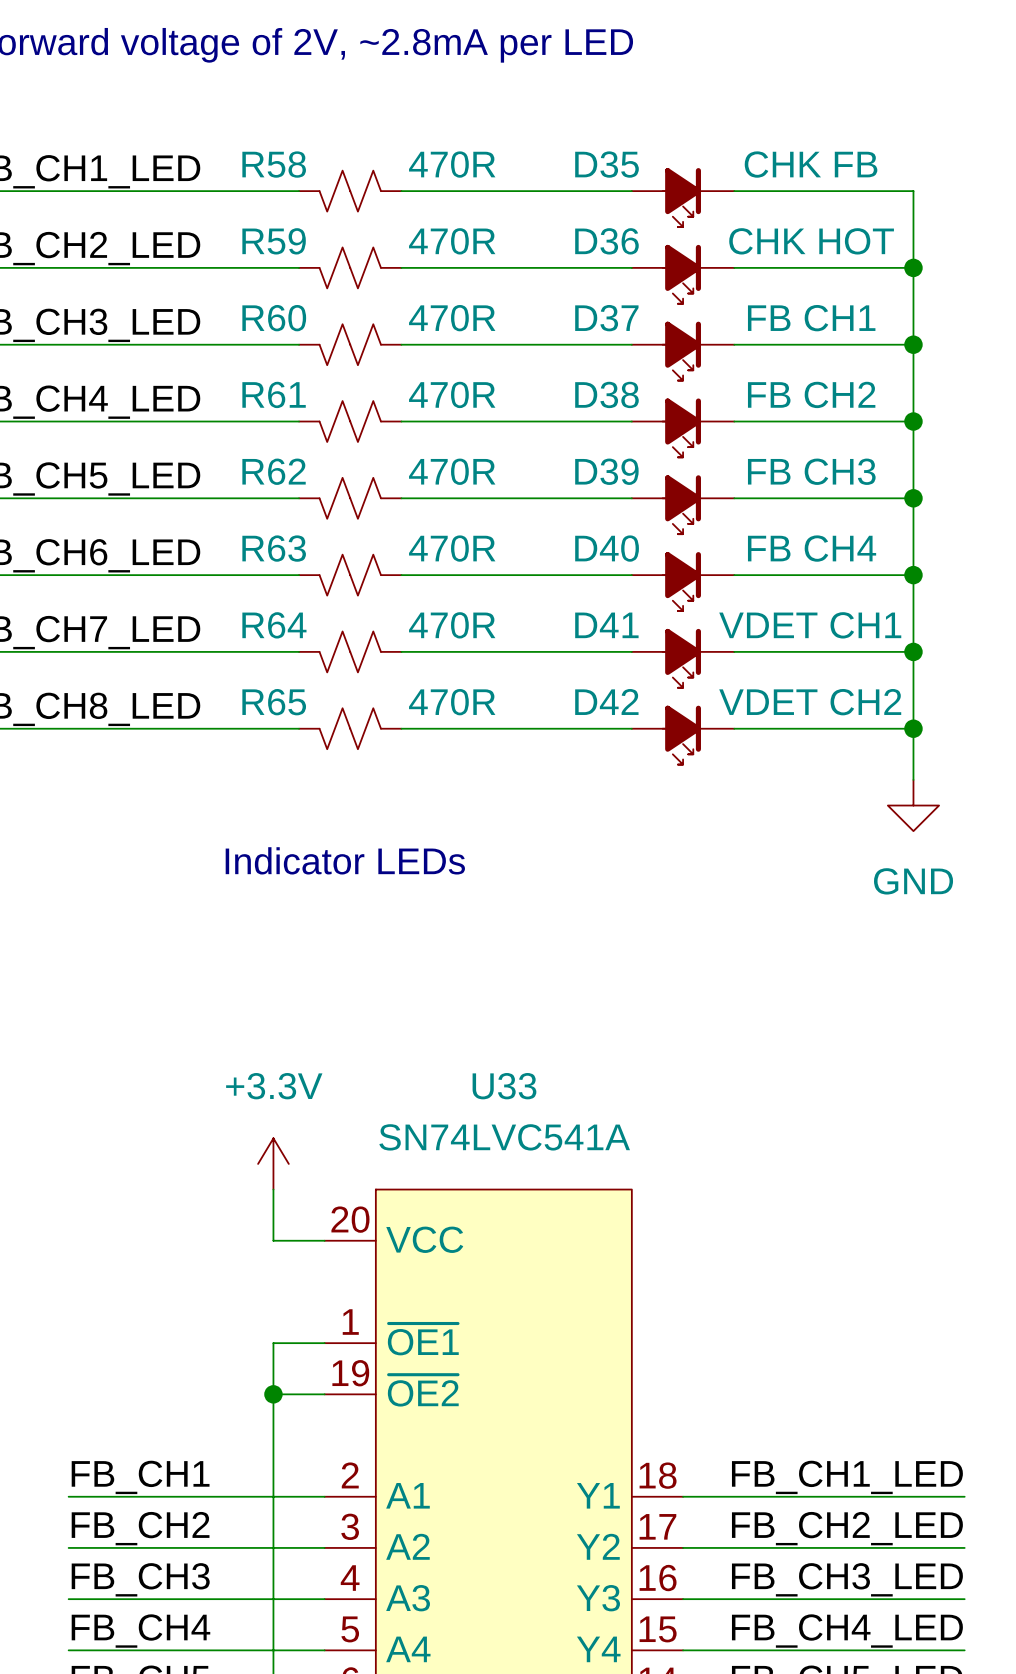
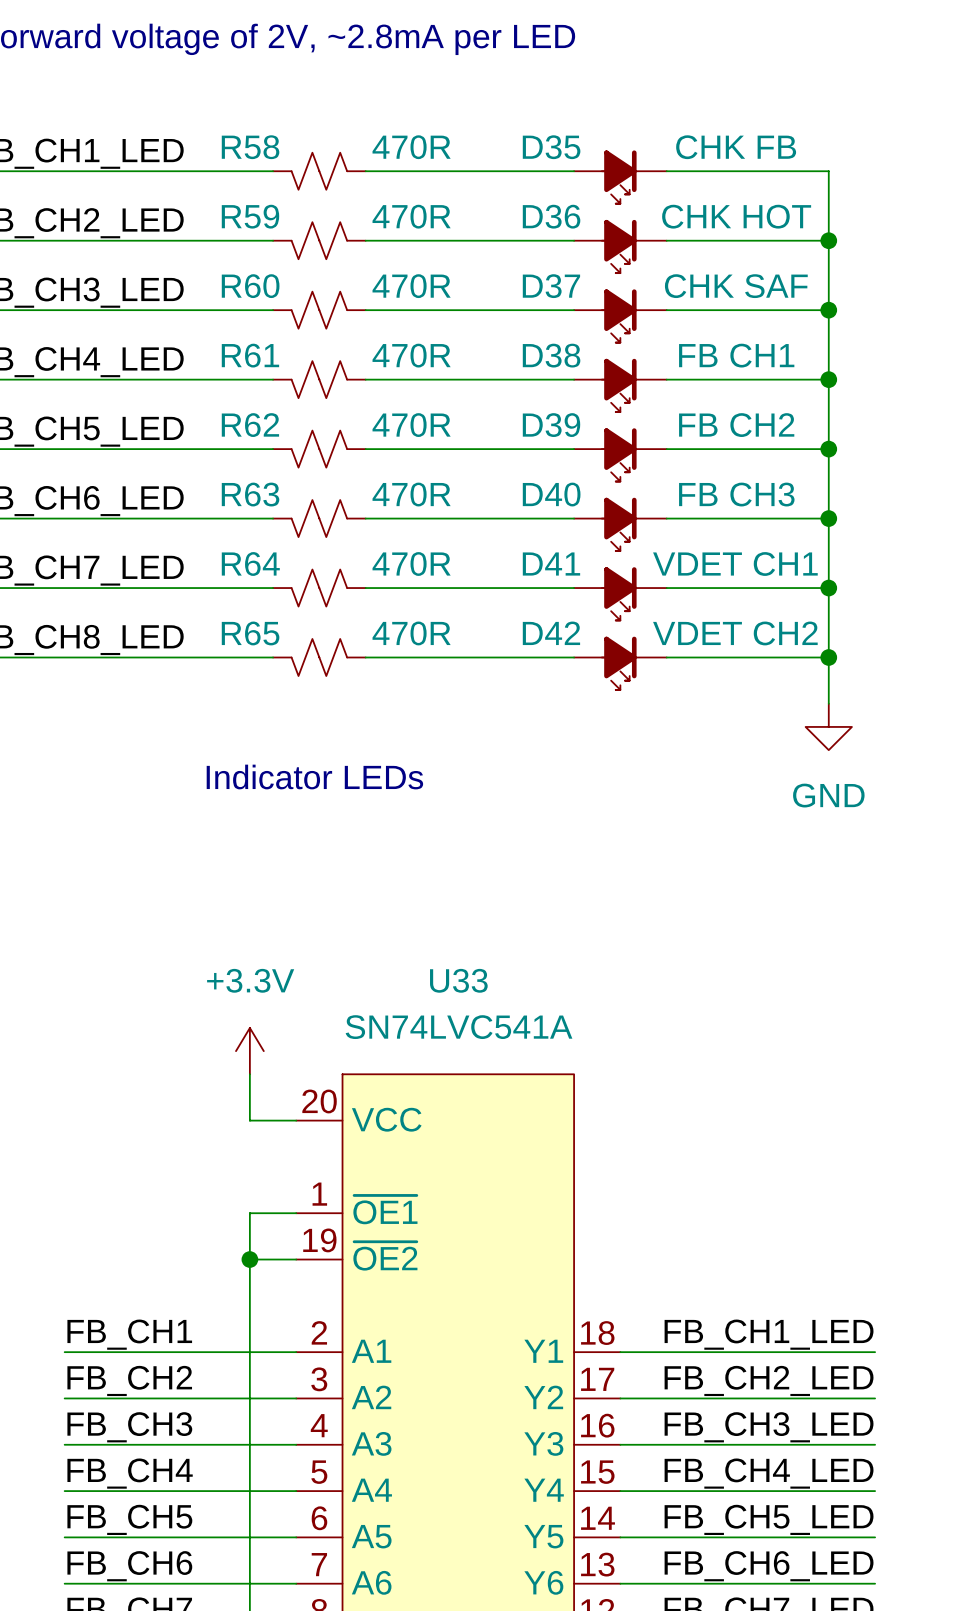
D37 value: FB CH1 (811, 318) -> CHK SAF (736, 286)
D38 value: FB CH2 (811, 394) -> FB CH1 (736, 355)
D39 value: FB CH3 (811, 471) -> FB CH2 (736, 425)
D40 value: FB CH4 (812, 548) -> FB CH3 (736, 494)

